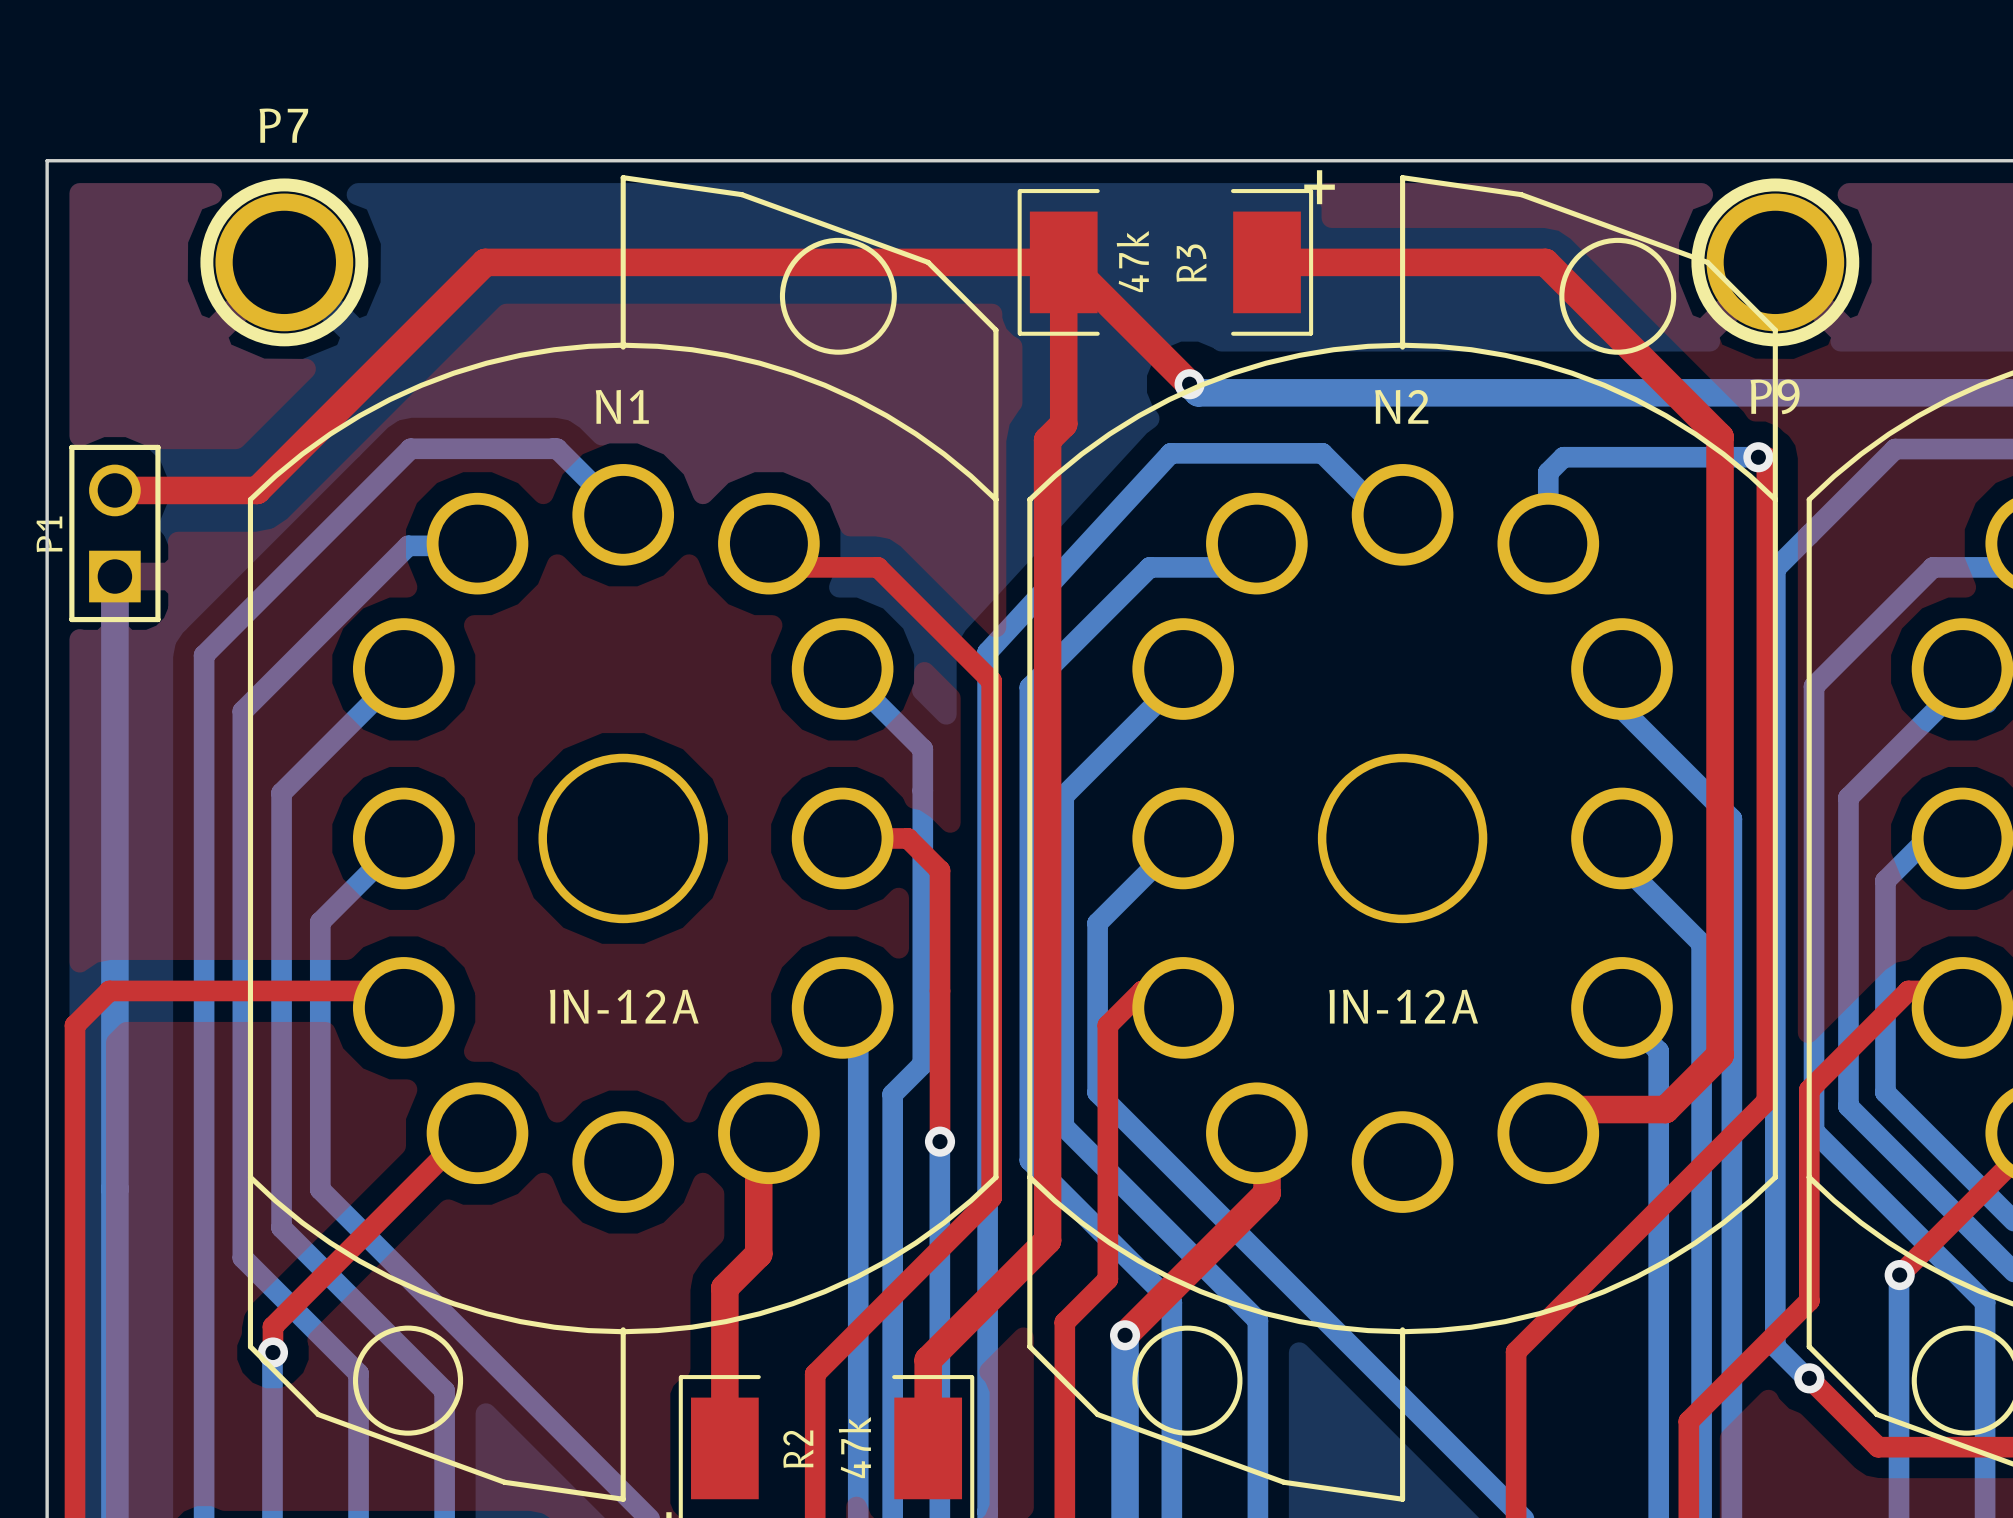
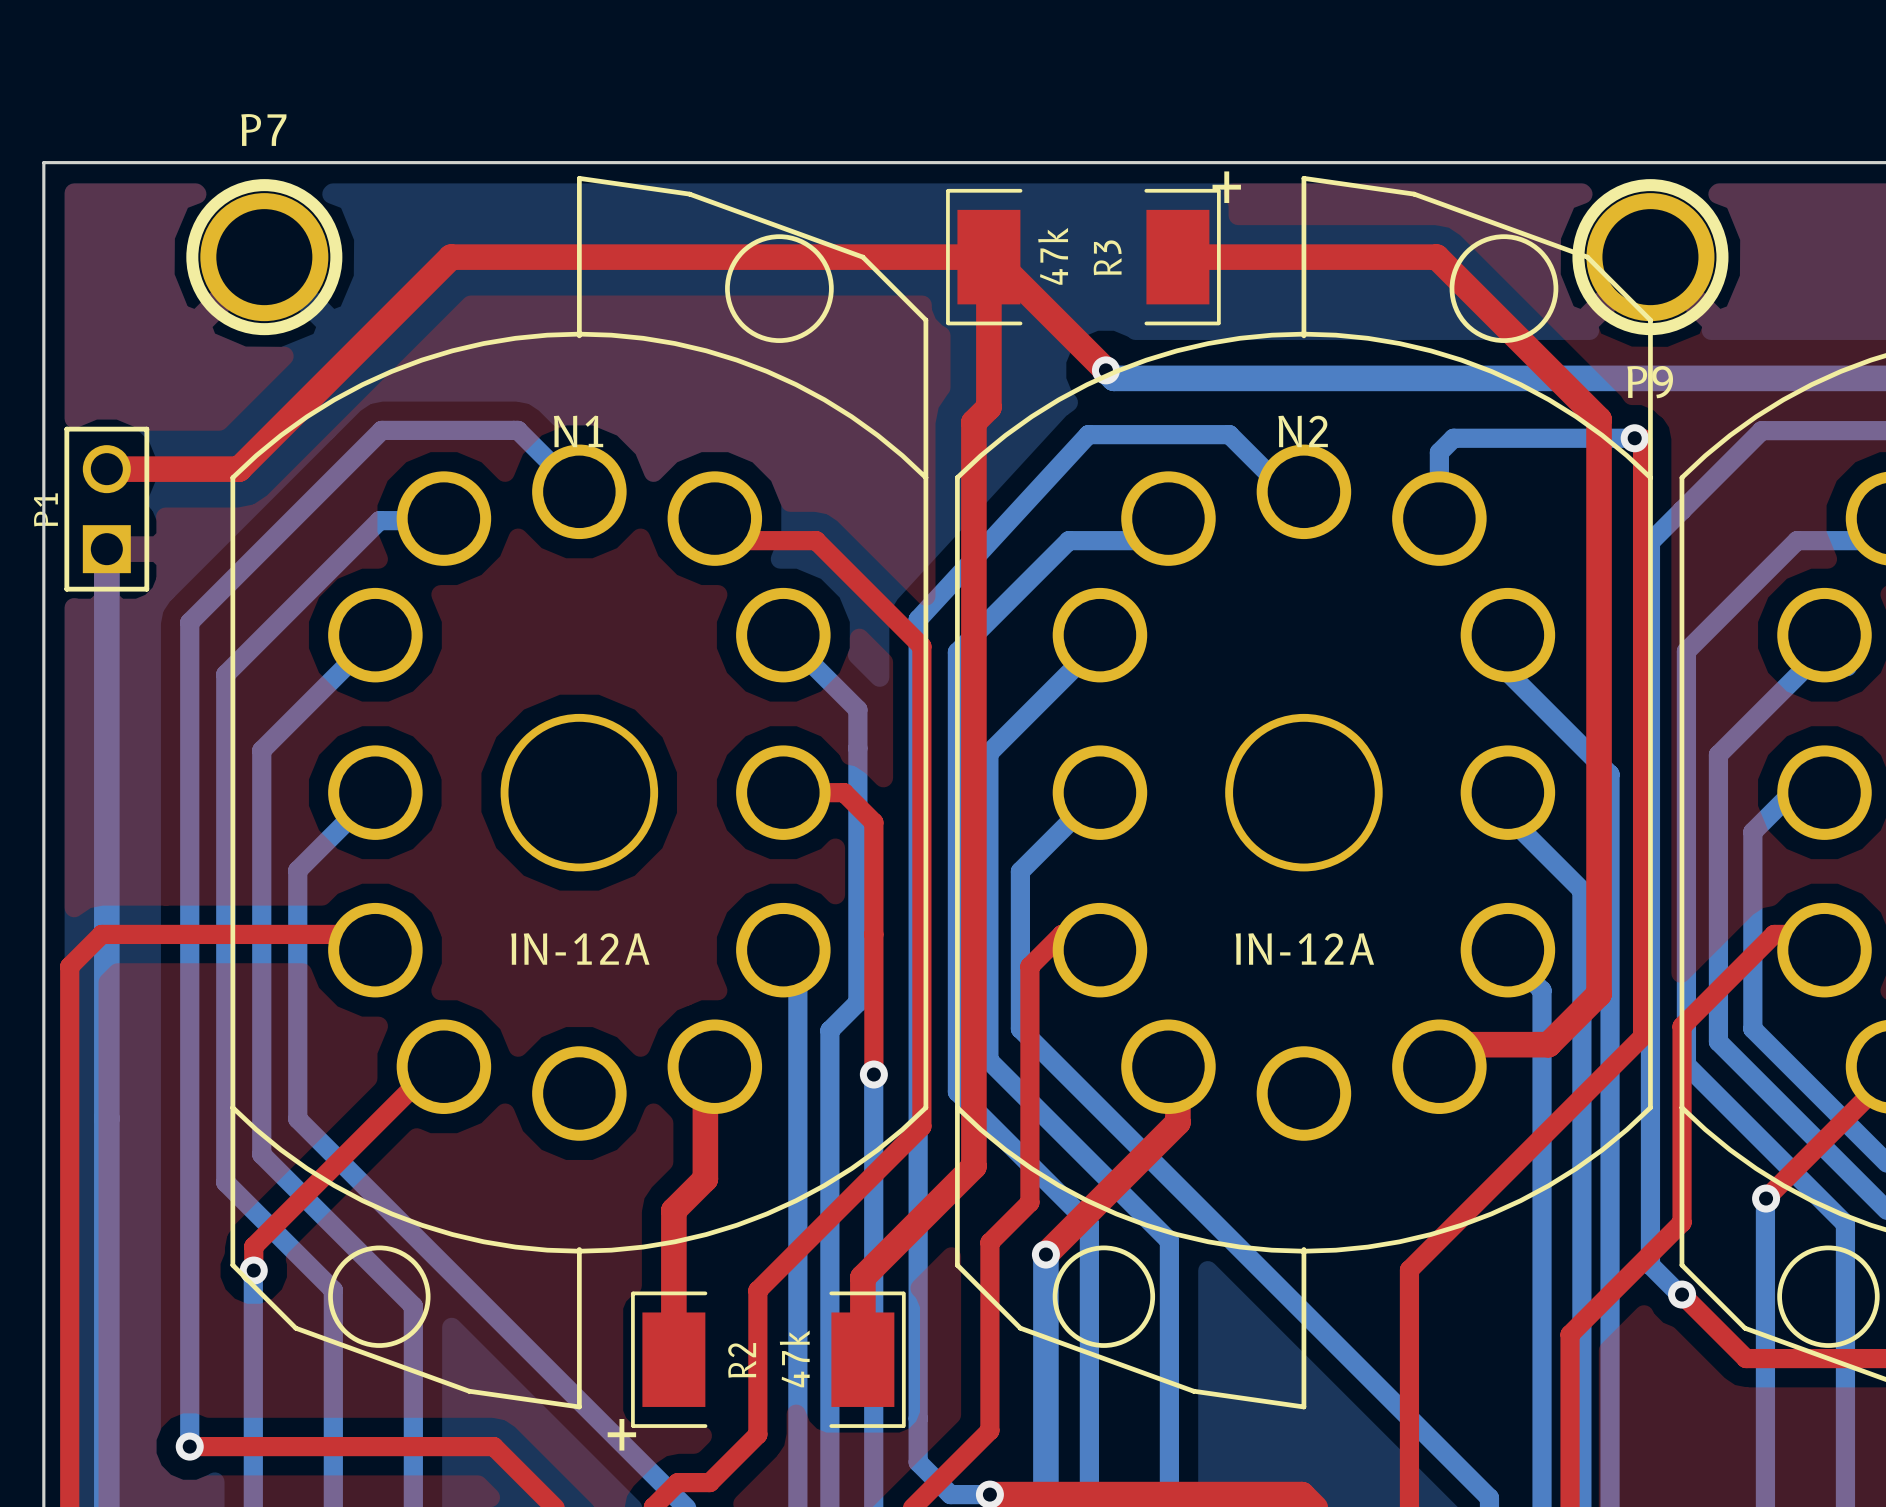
N1 name position: N1 (622, 406) -> N1 (578, 431)
N2 name position: N2 (1401, 406) -> N2 (1303, 431)

